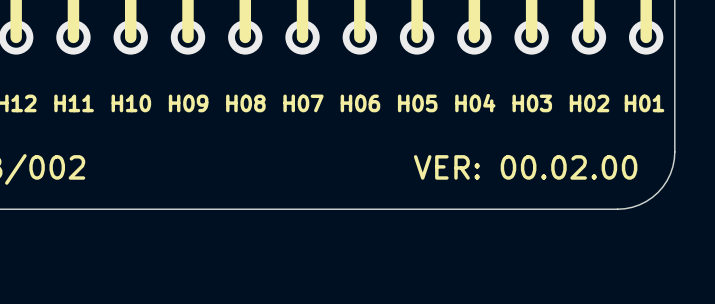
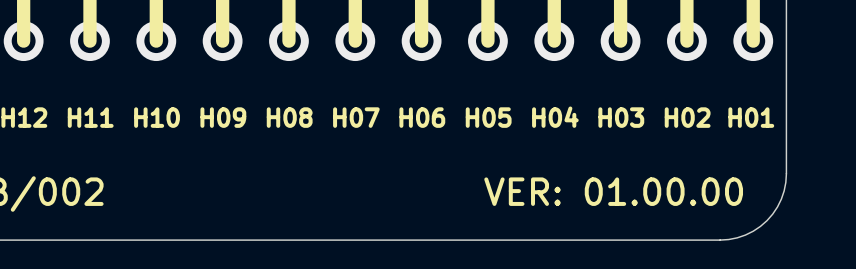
text: VER: 00.02.00 (525, 167) -> VER: 01.00.00 (613, 191)

